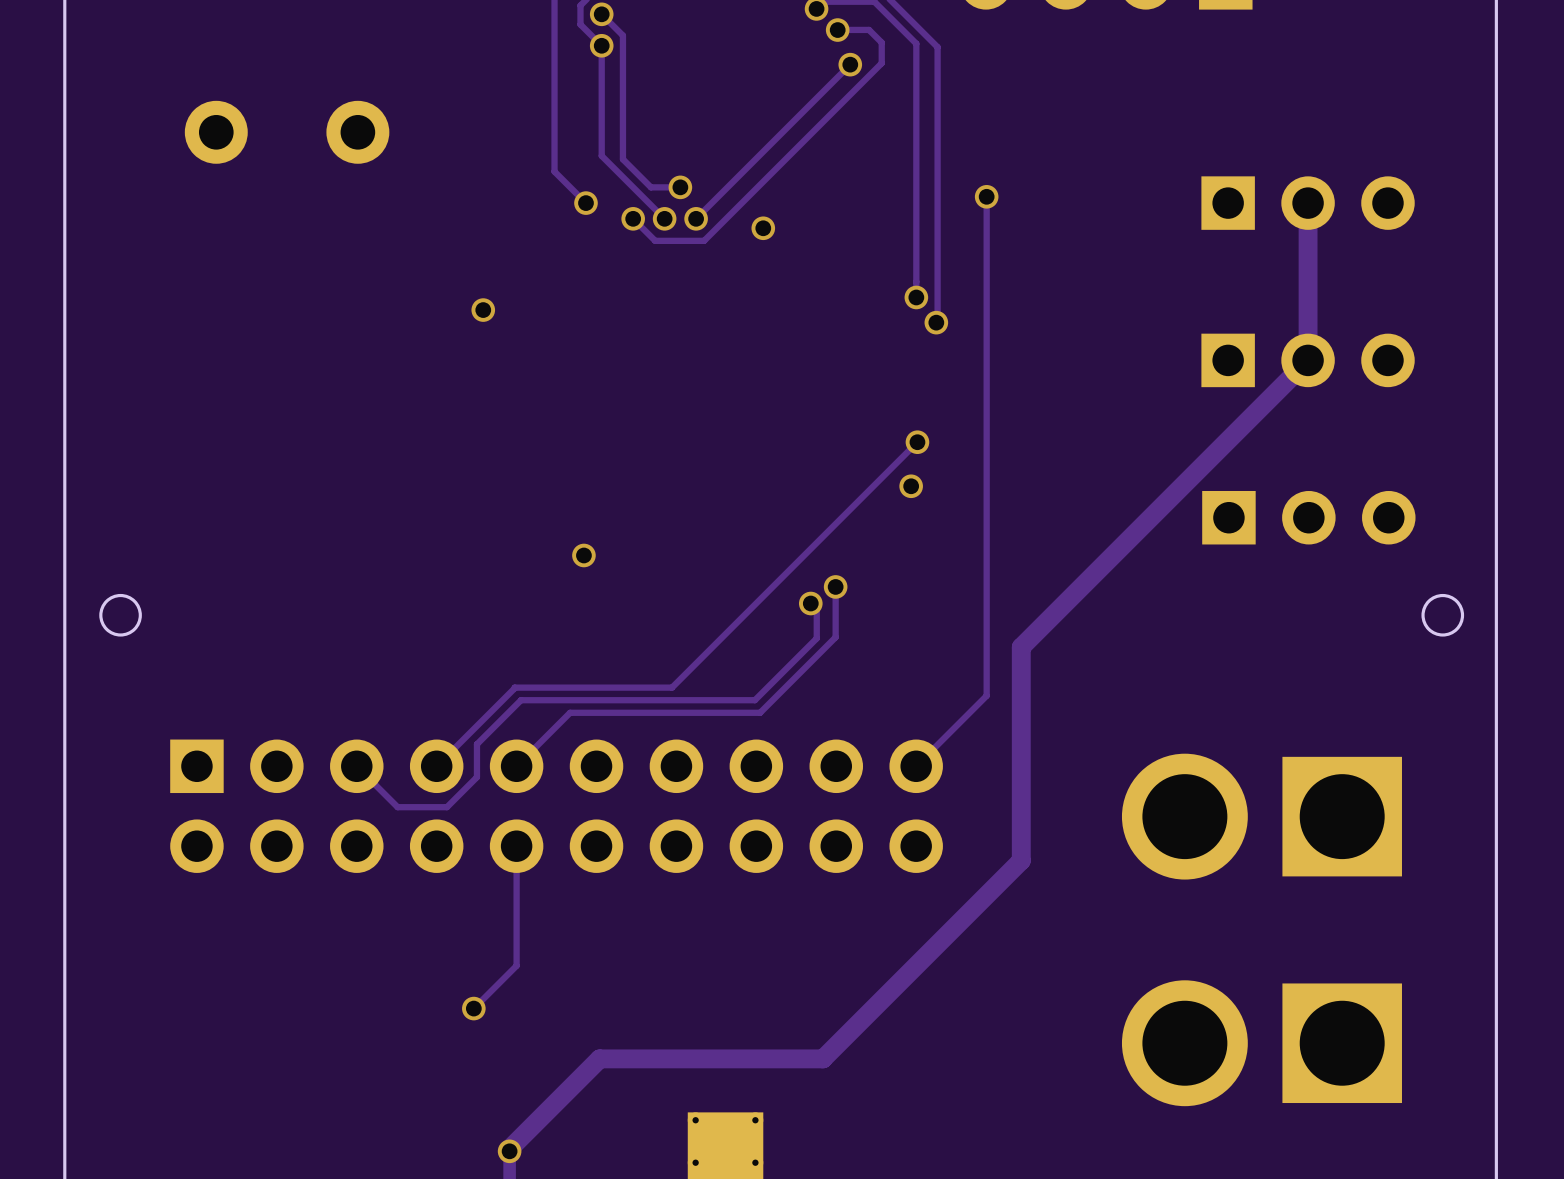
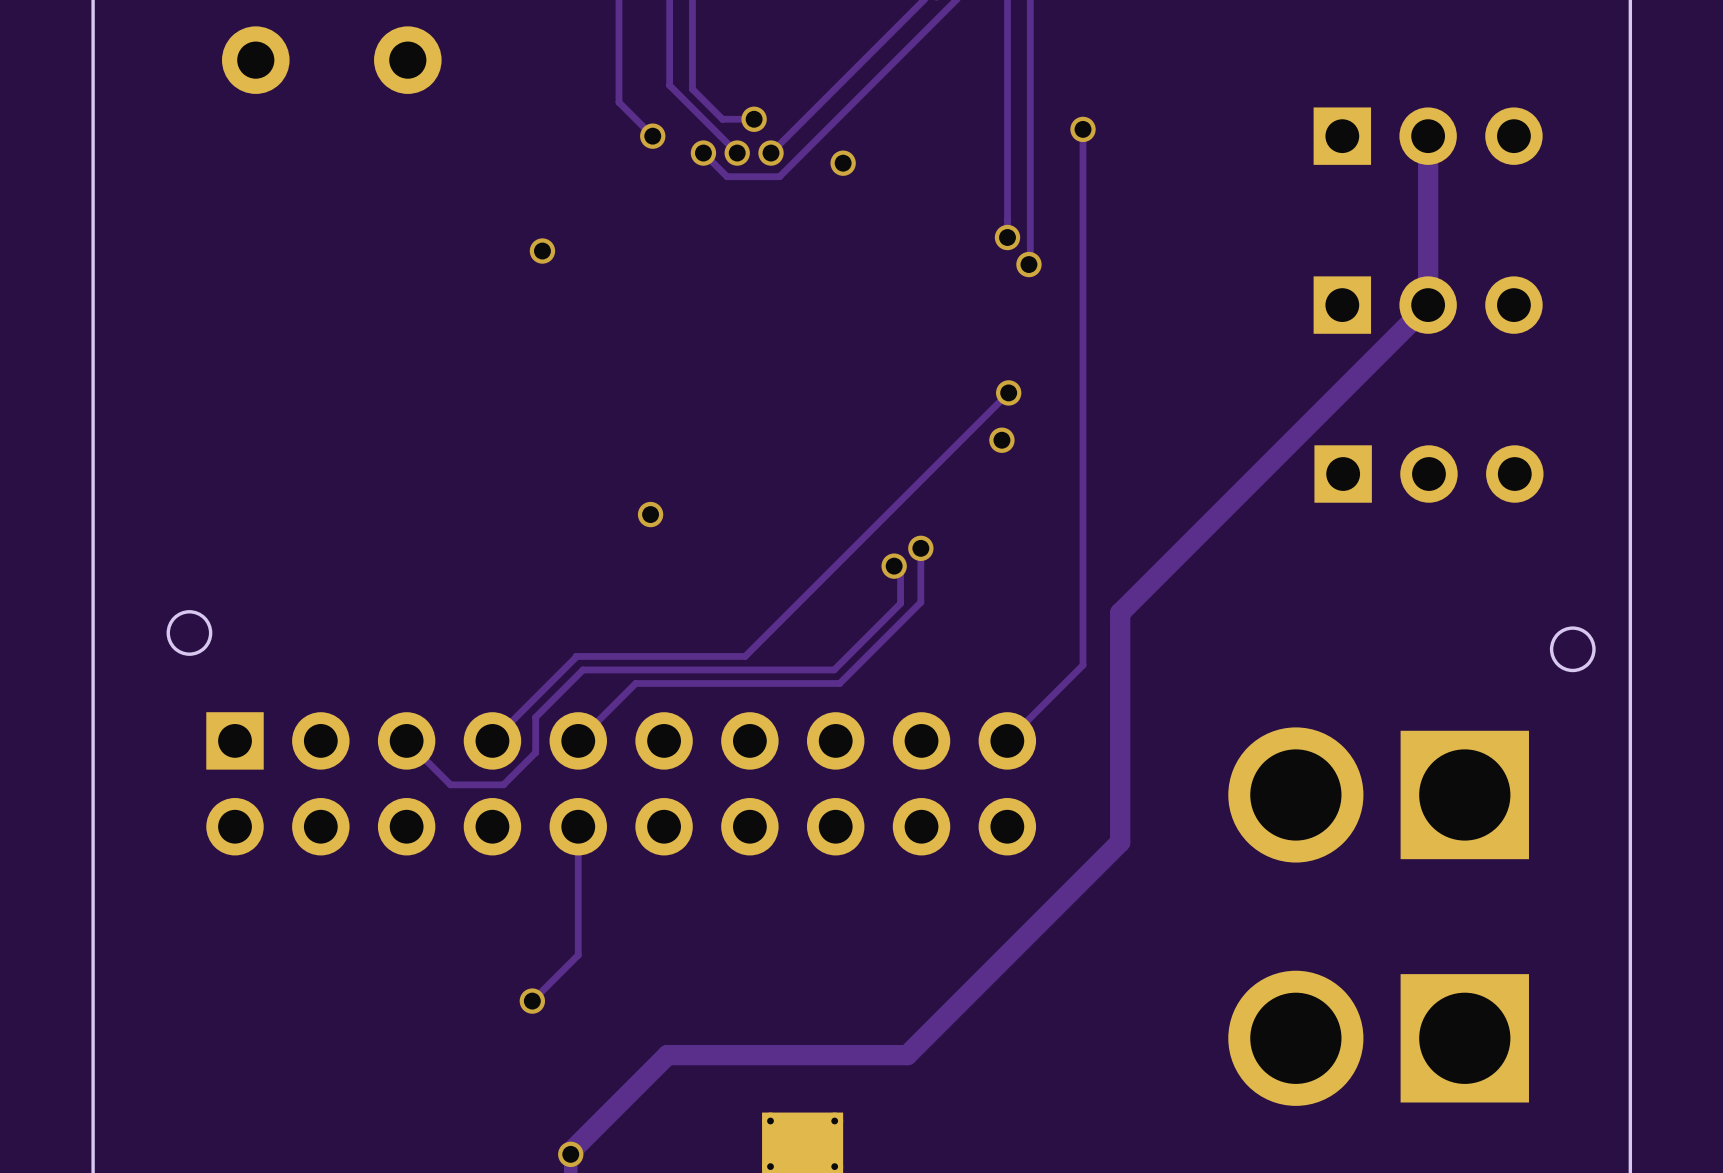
round board edge position: (120, 615) -> (189, 632)
round board edge position: (1442, 615) -> (1572, 649)

